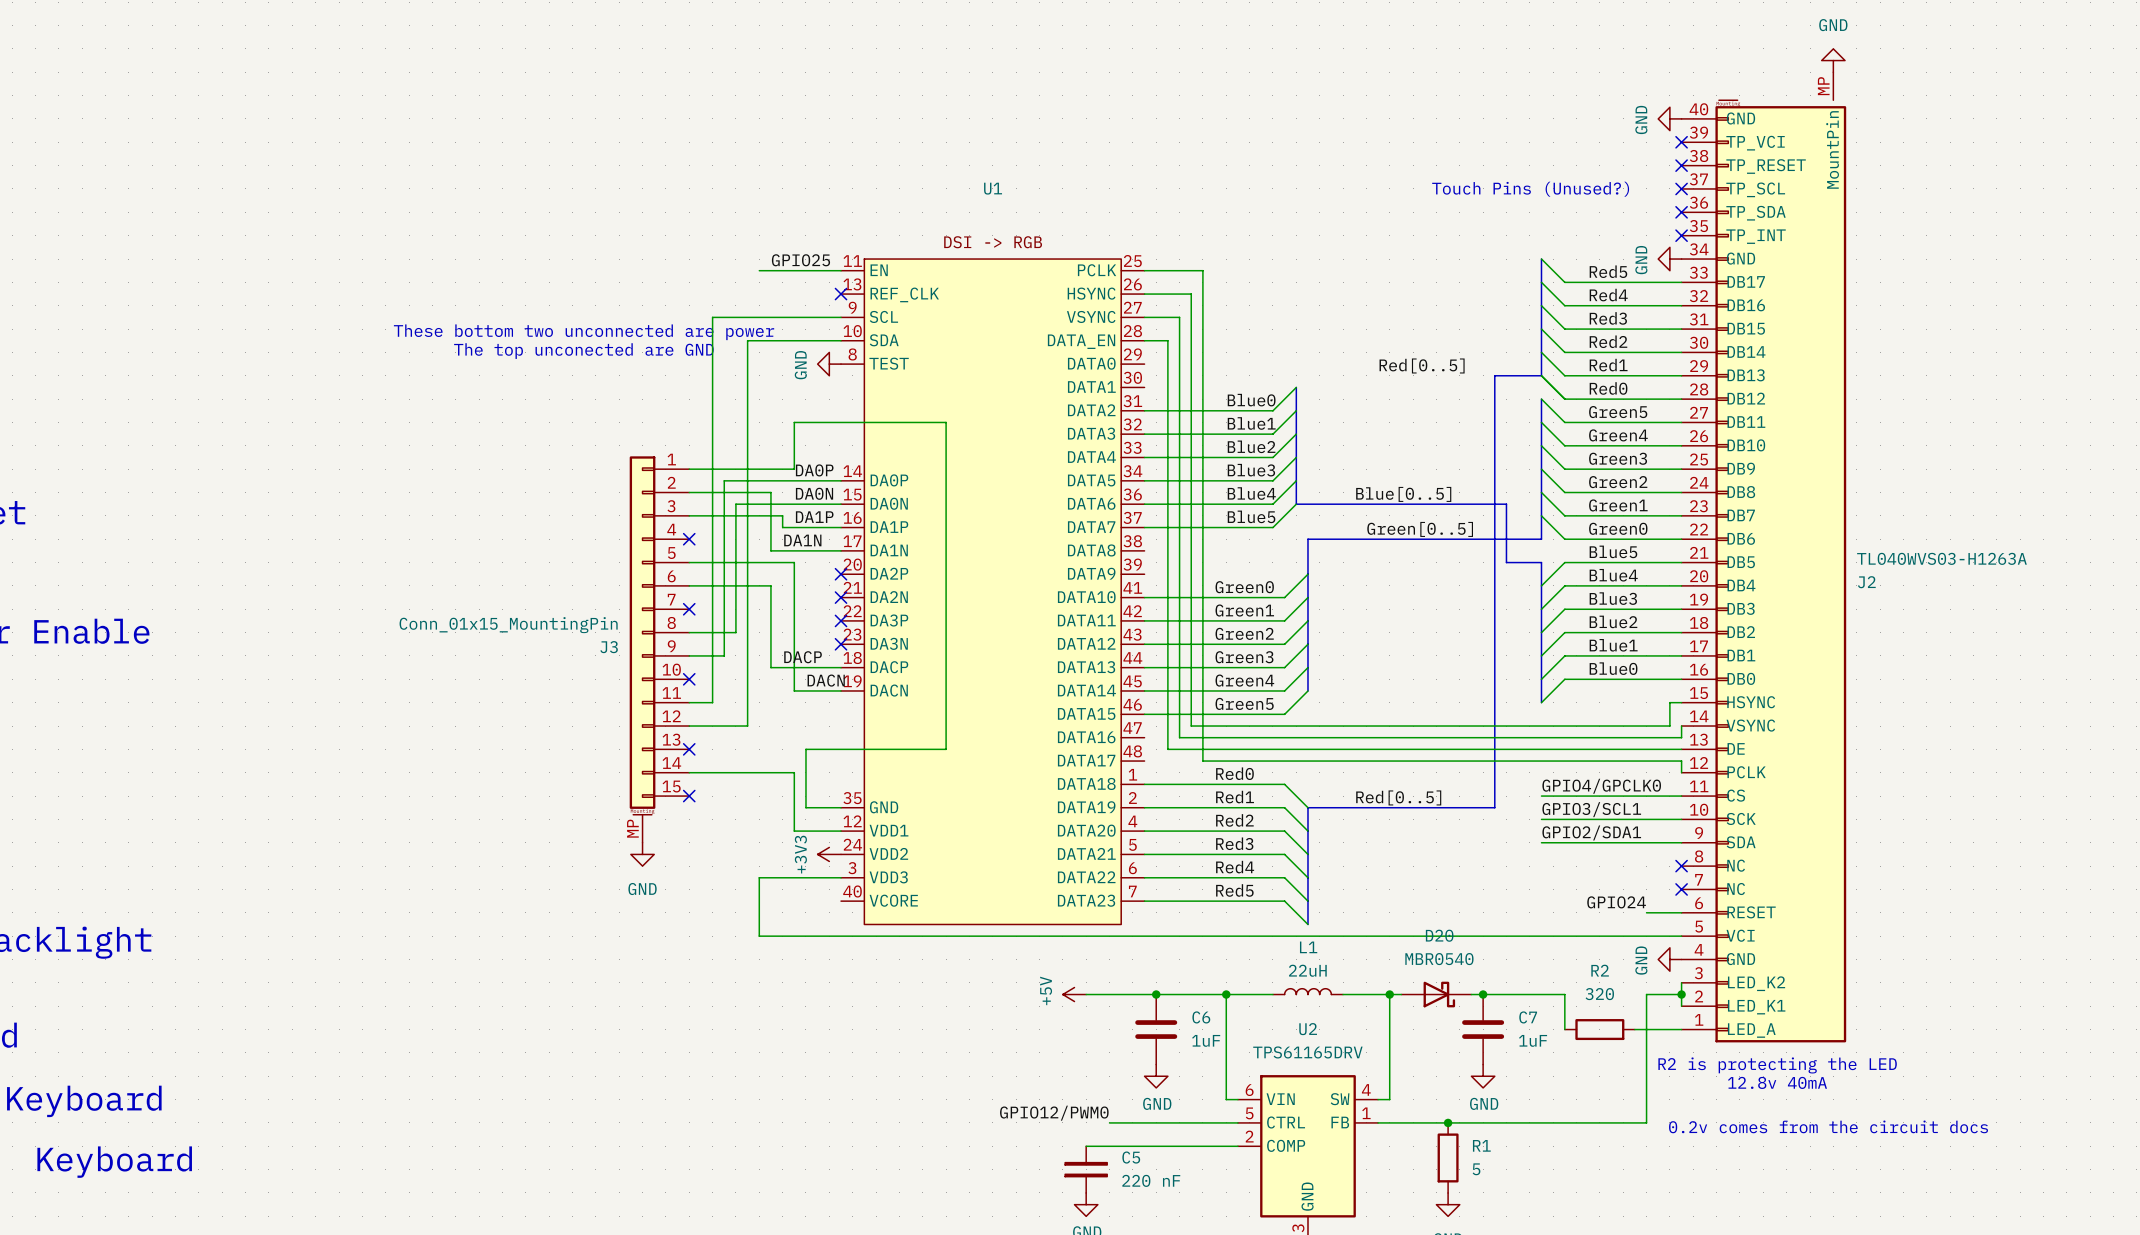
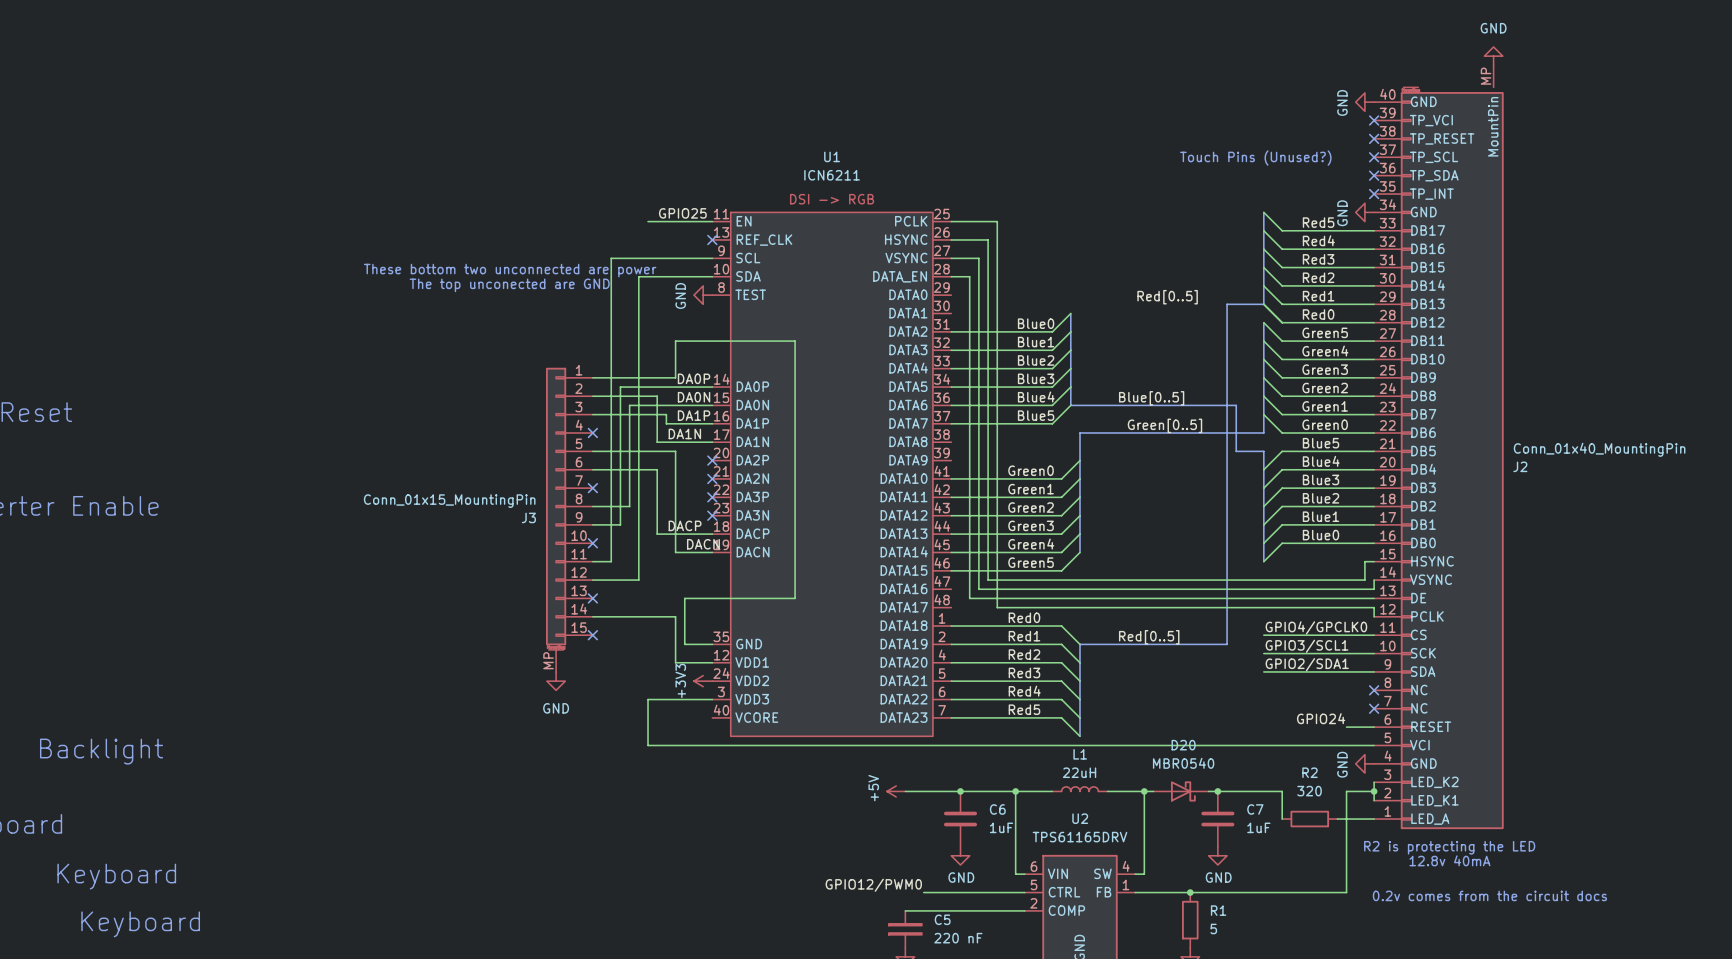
U1 value: none -> ICN6211 (832, 175)
J2 value: TL040WVS03-H1263A (1941, 558) -> Conn_01x40_MountingPin (1599, 449)

